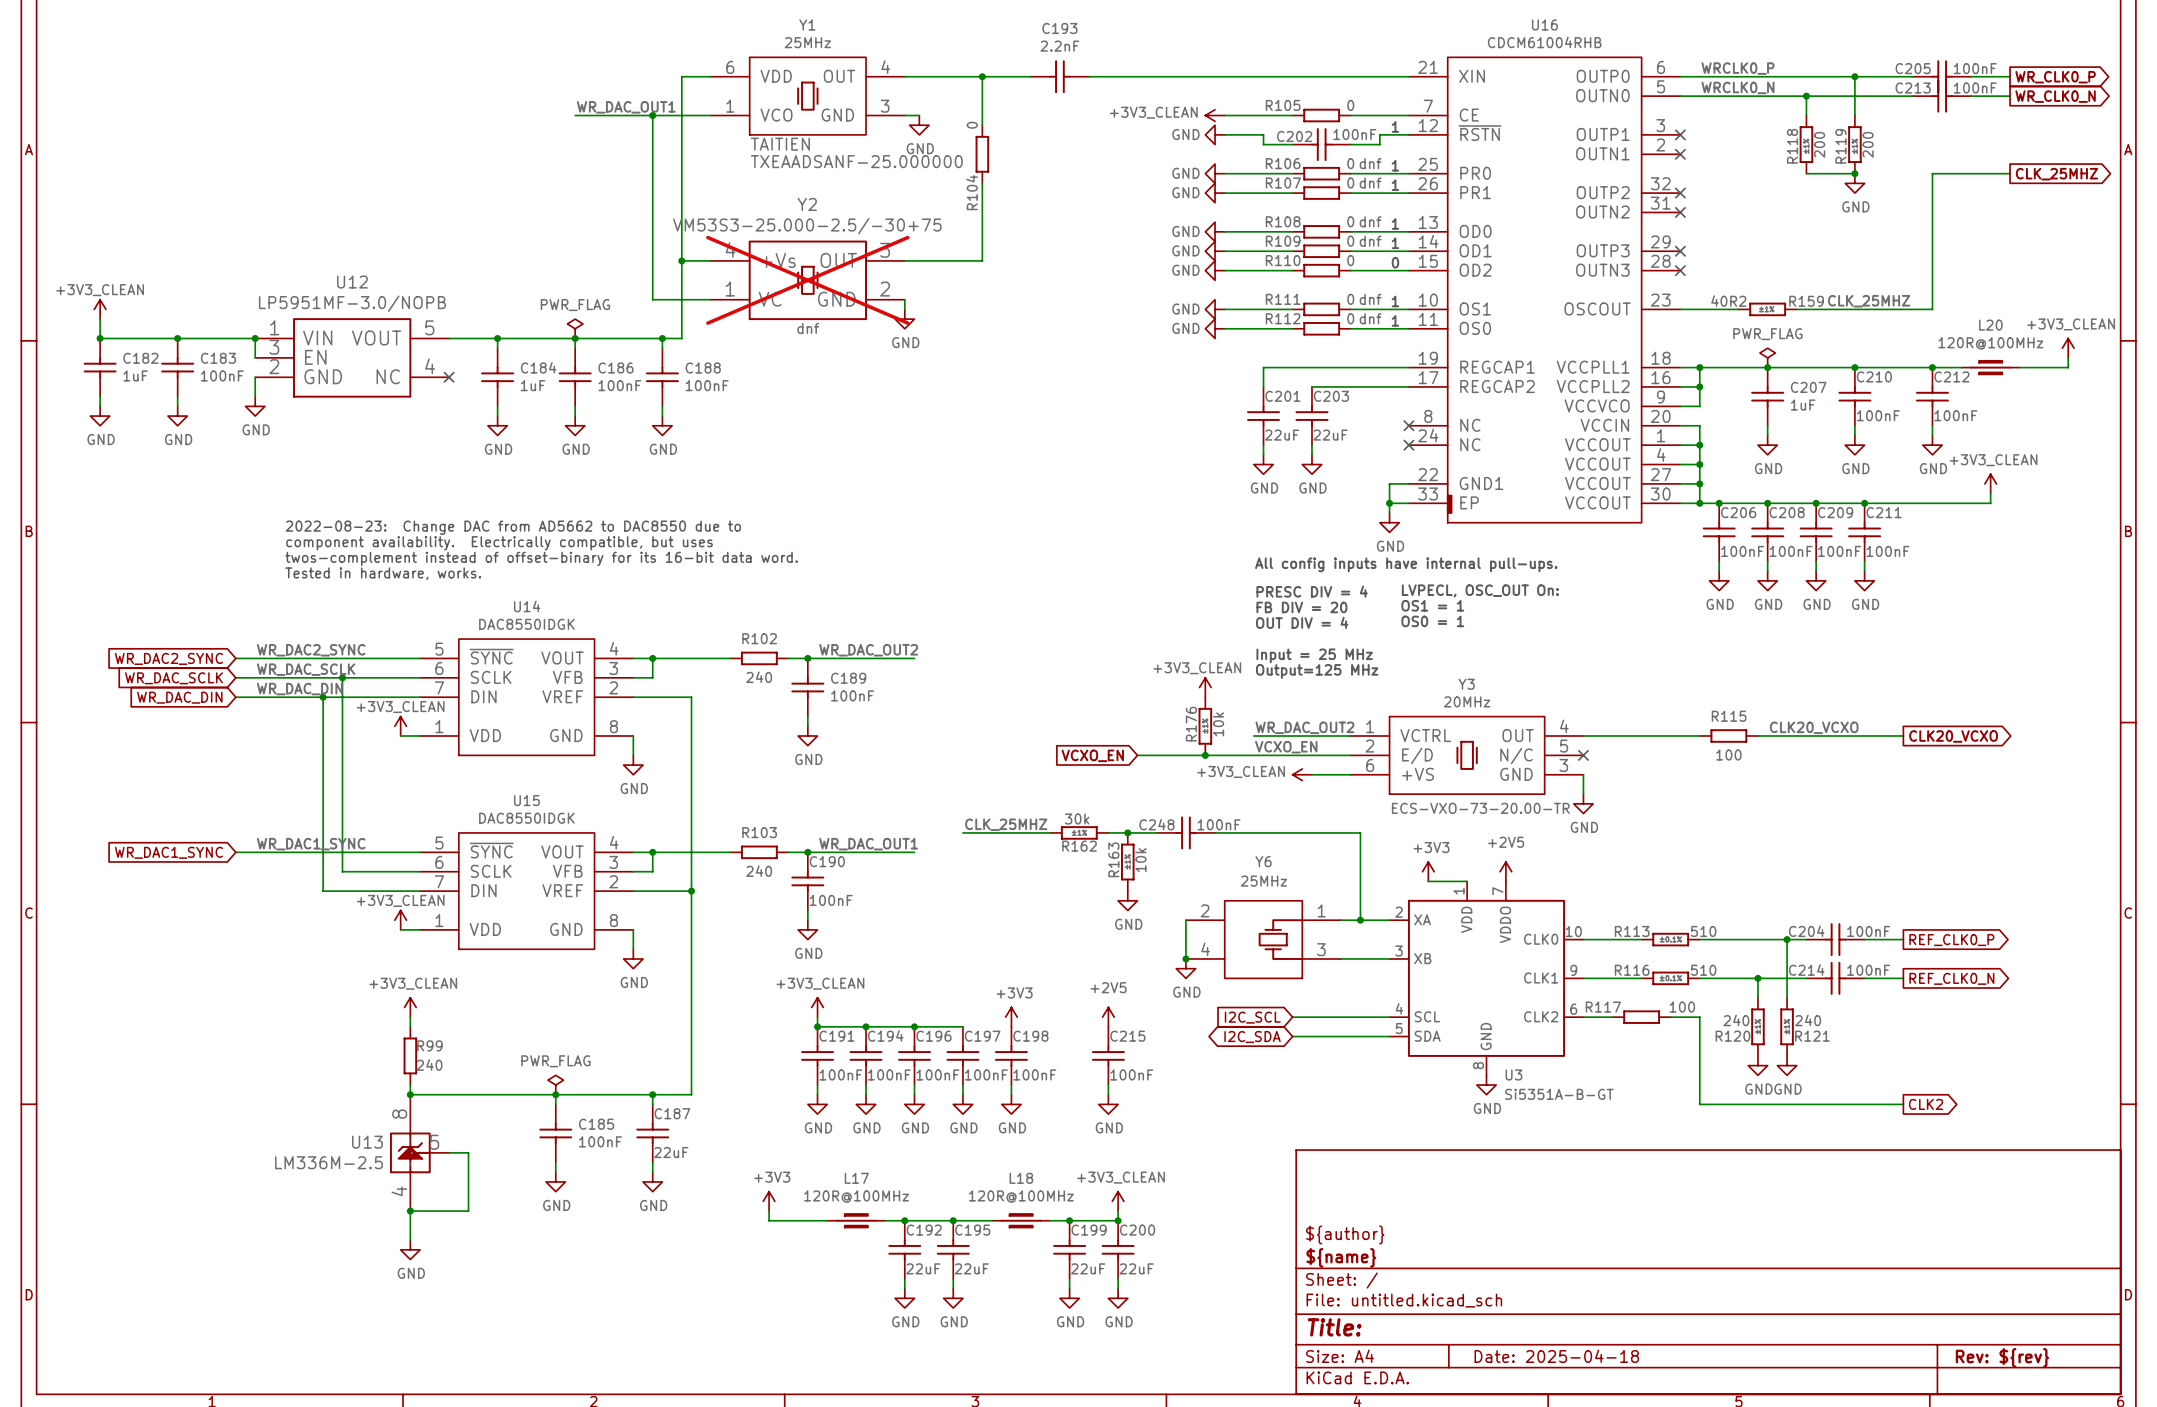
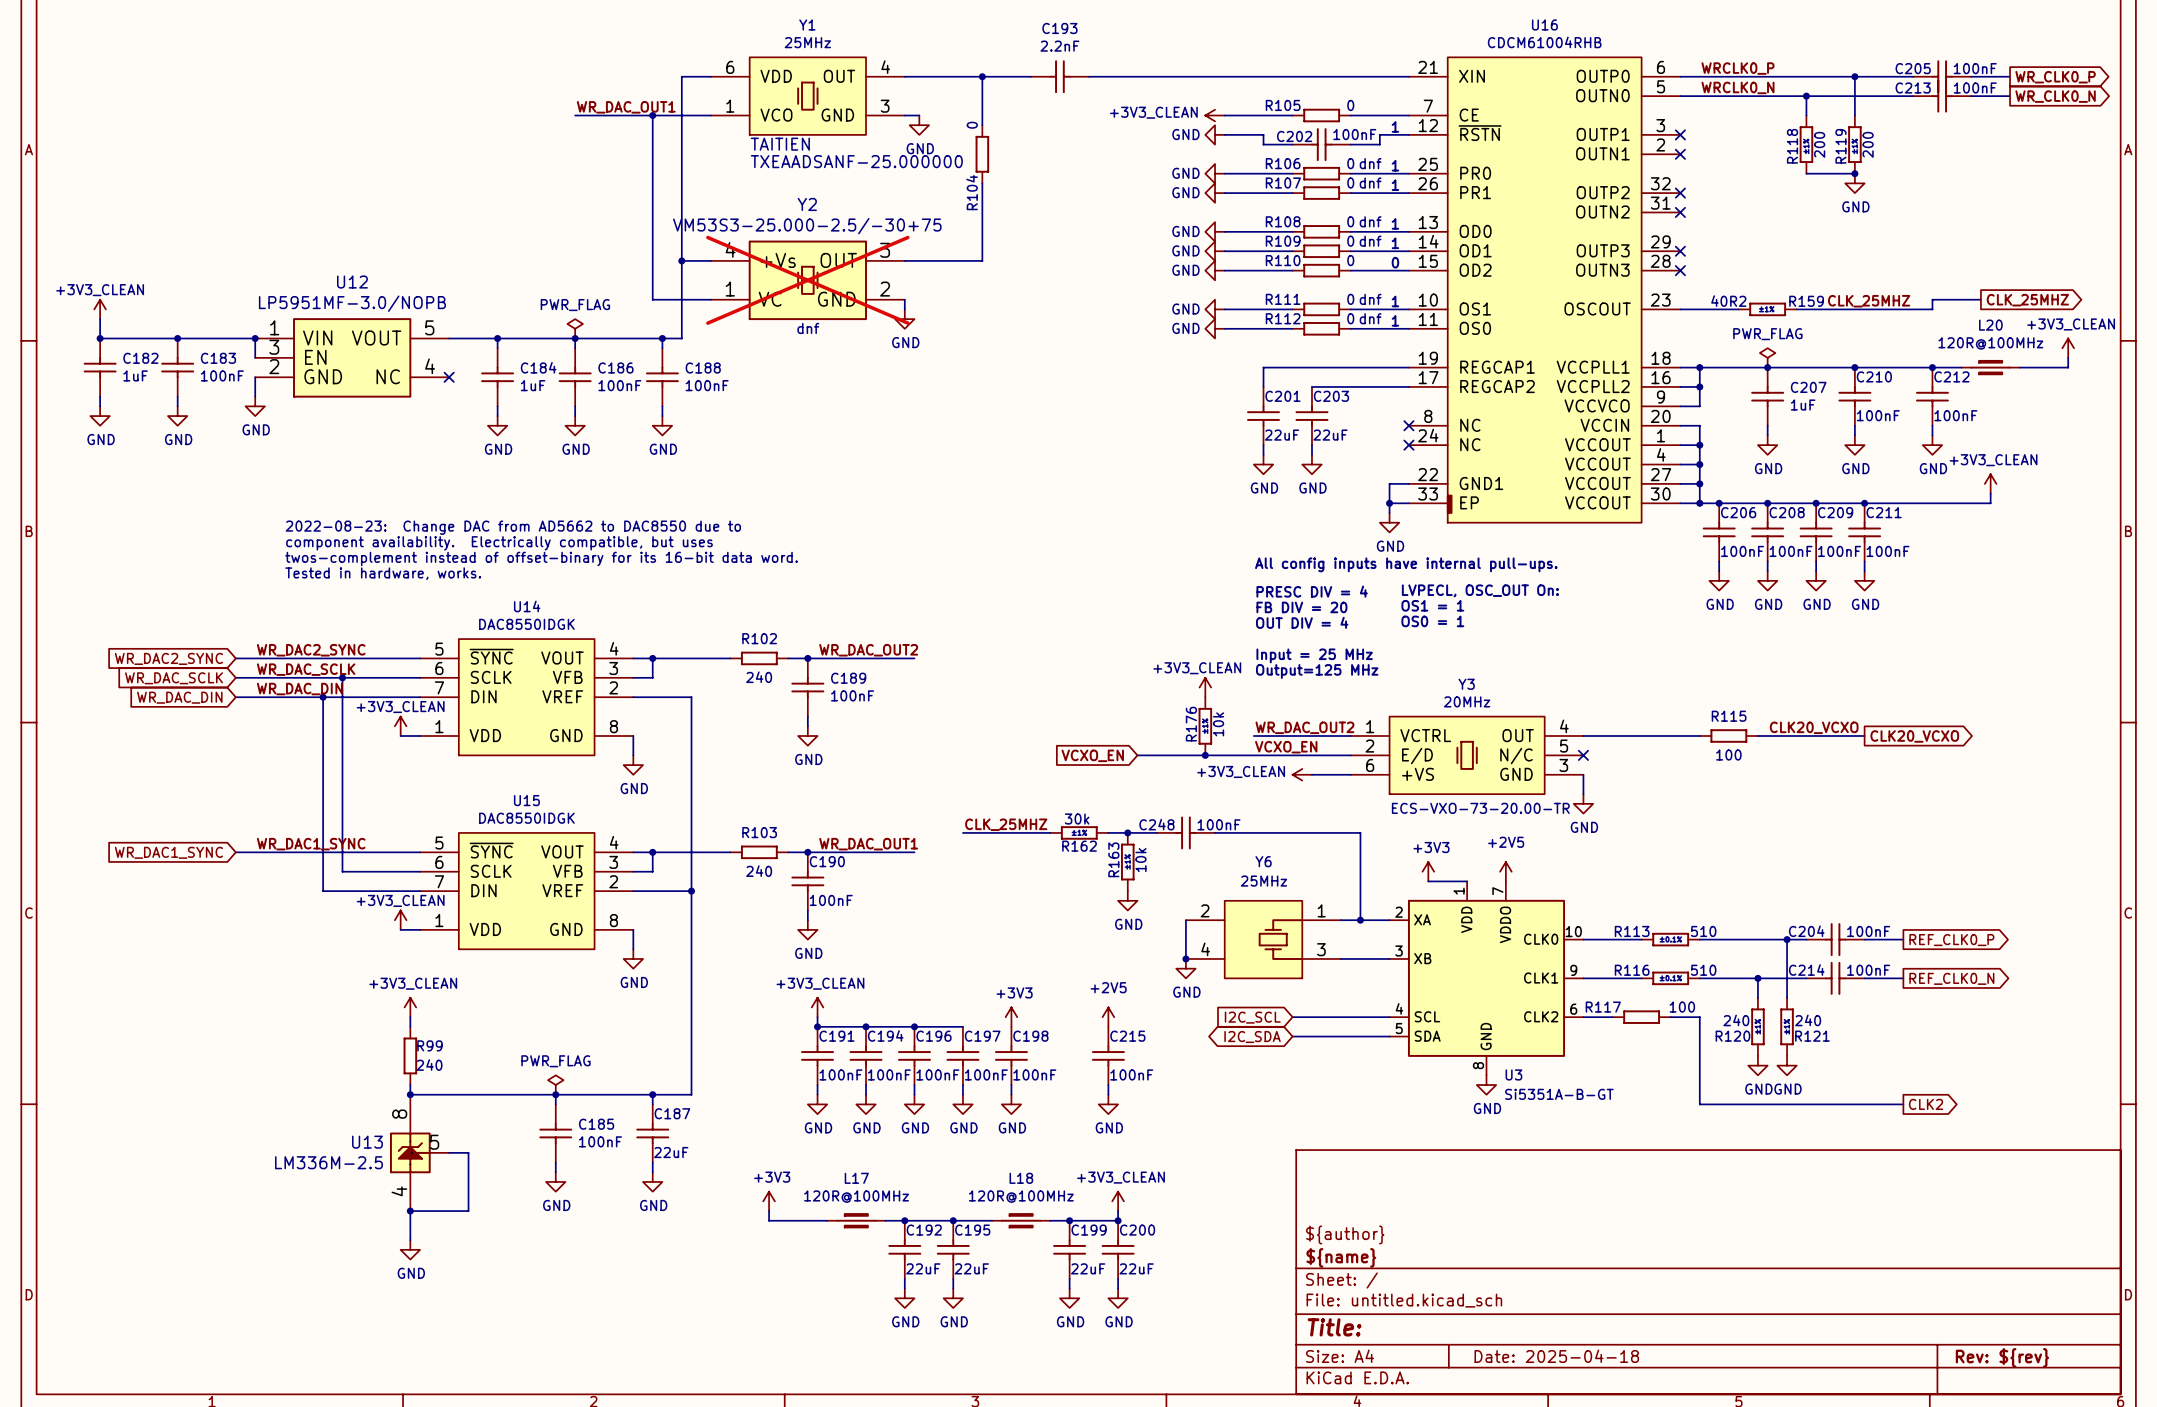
wire: (2010, 173) (1932, 173) (1932, 299) -> (1980, 299) (1932, 299)
global label position: CLK_25MHZ (2056, 174) -> CLK_25MHZ (2027, 300)
wire: (1864, 736) (1903, 736) -> none
global label position: CLK20_VCXO (1953, 736) -> CLK20_VCXO (1914, 736)

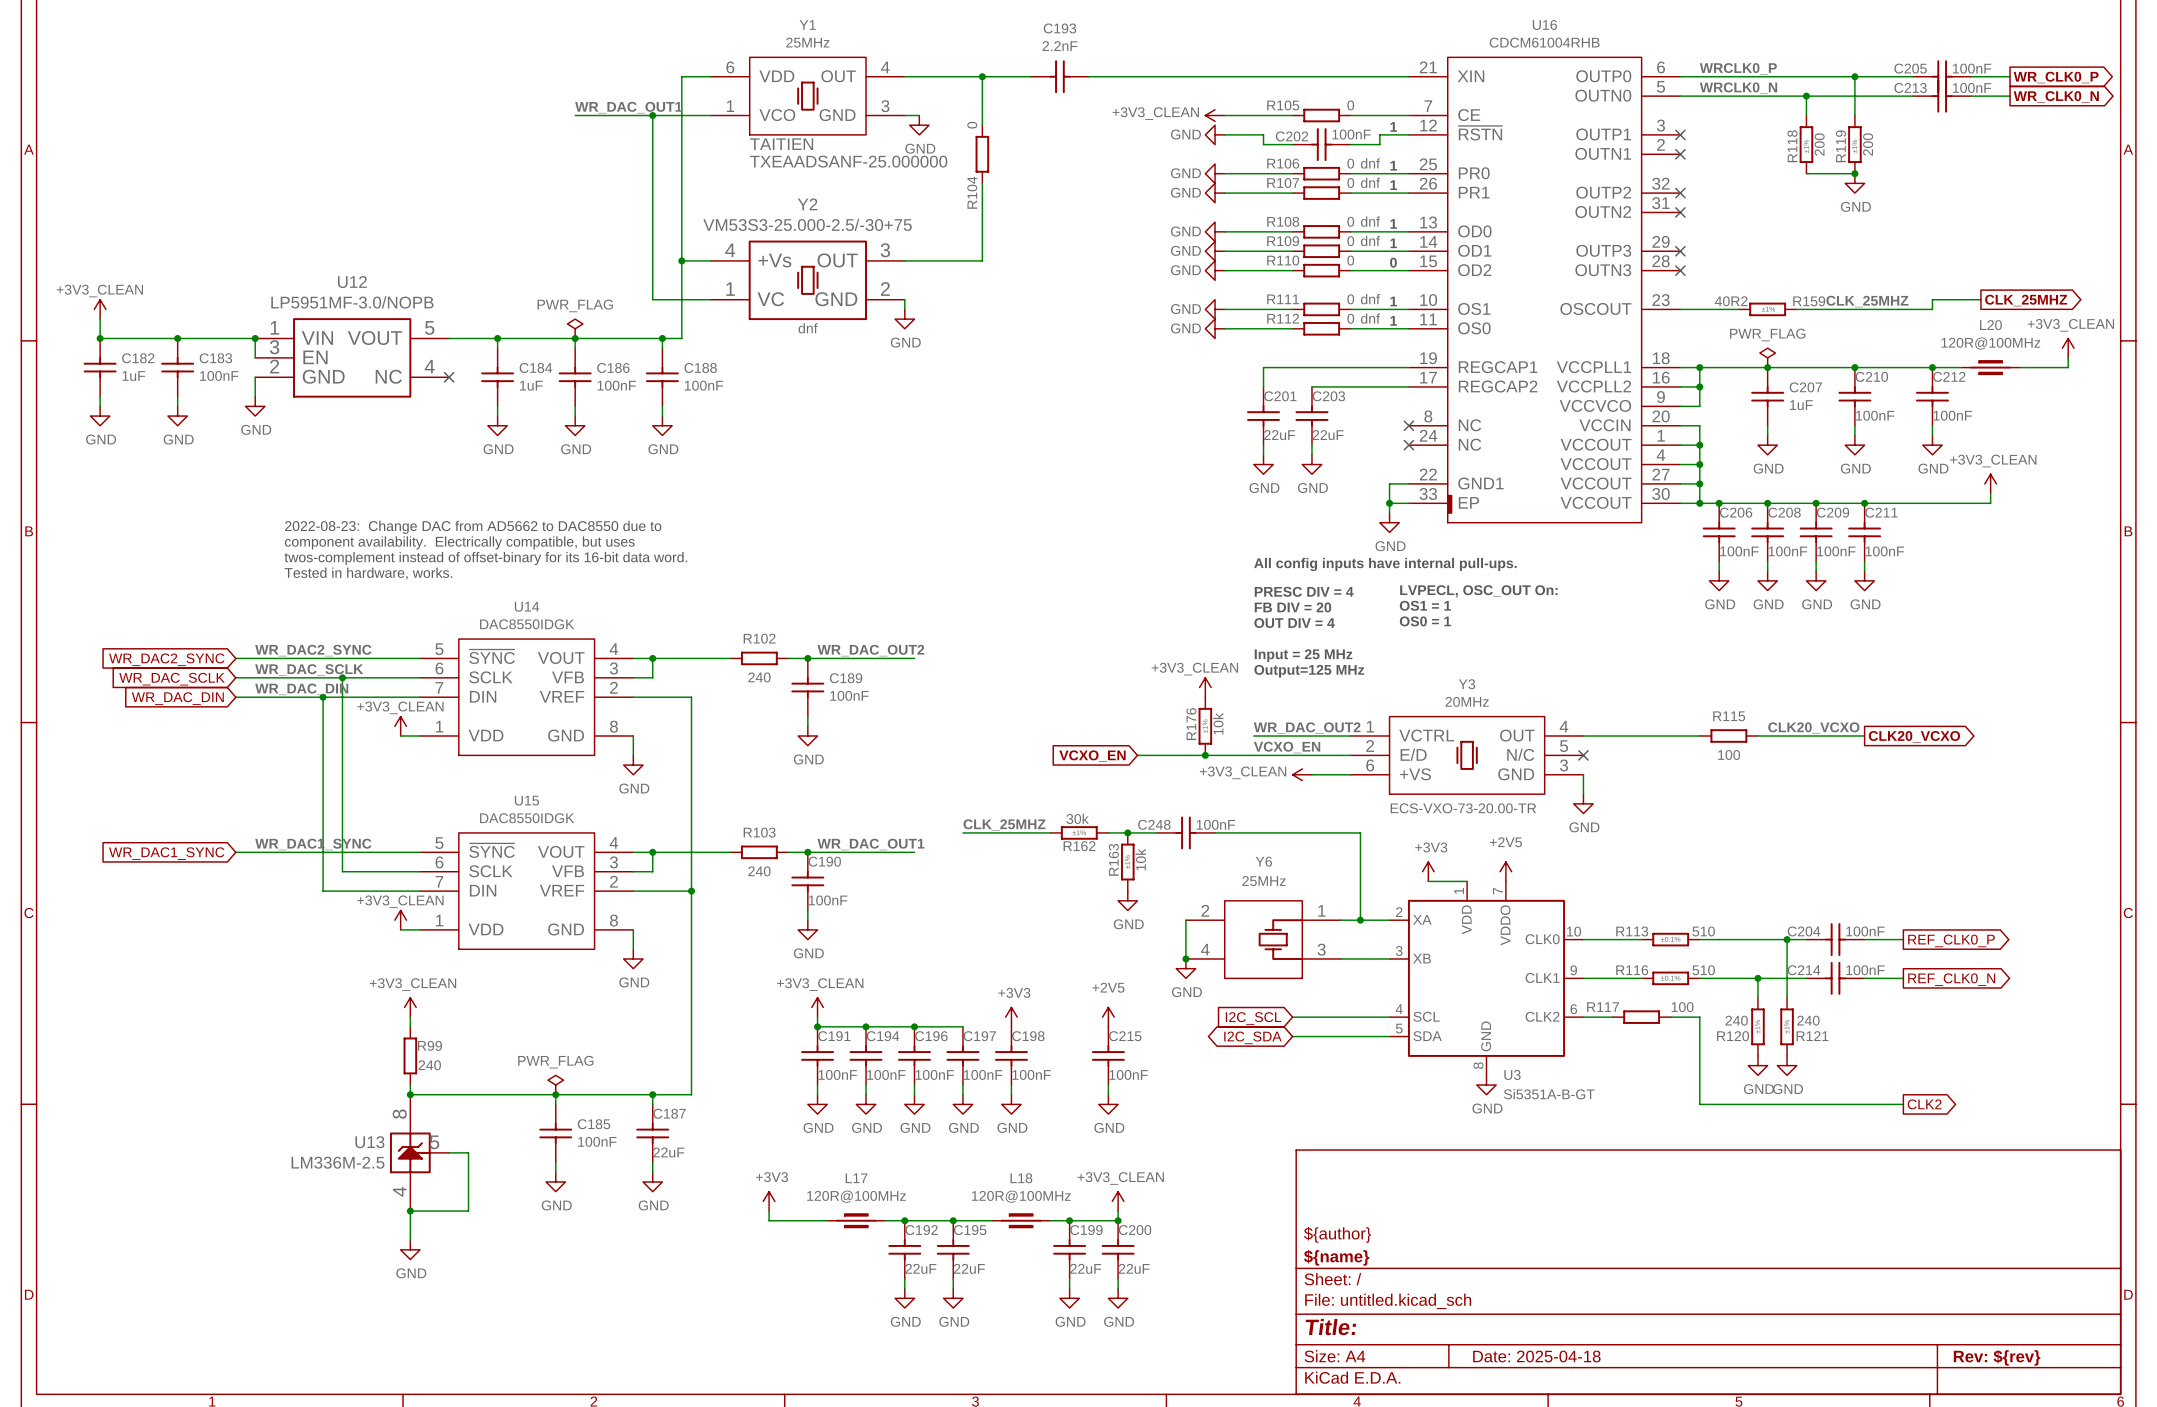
Y2 do-not-place cross: (807, 280) -> none

